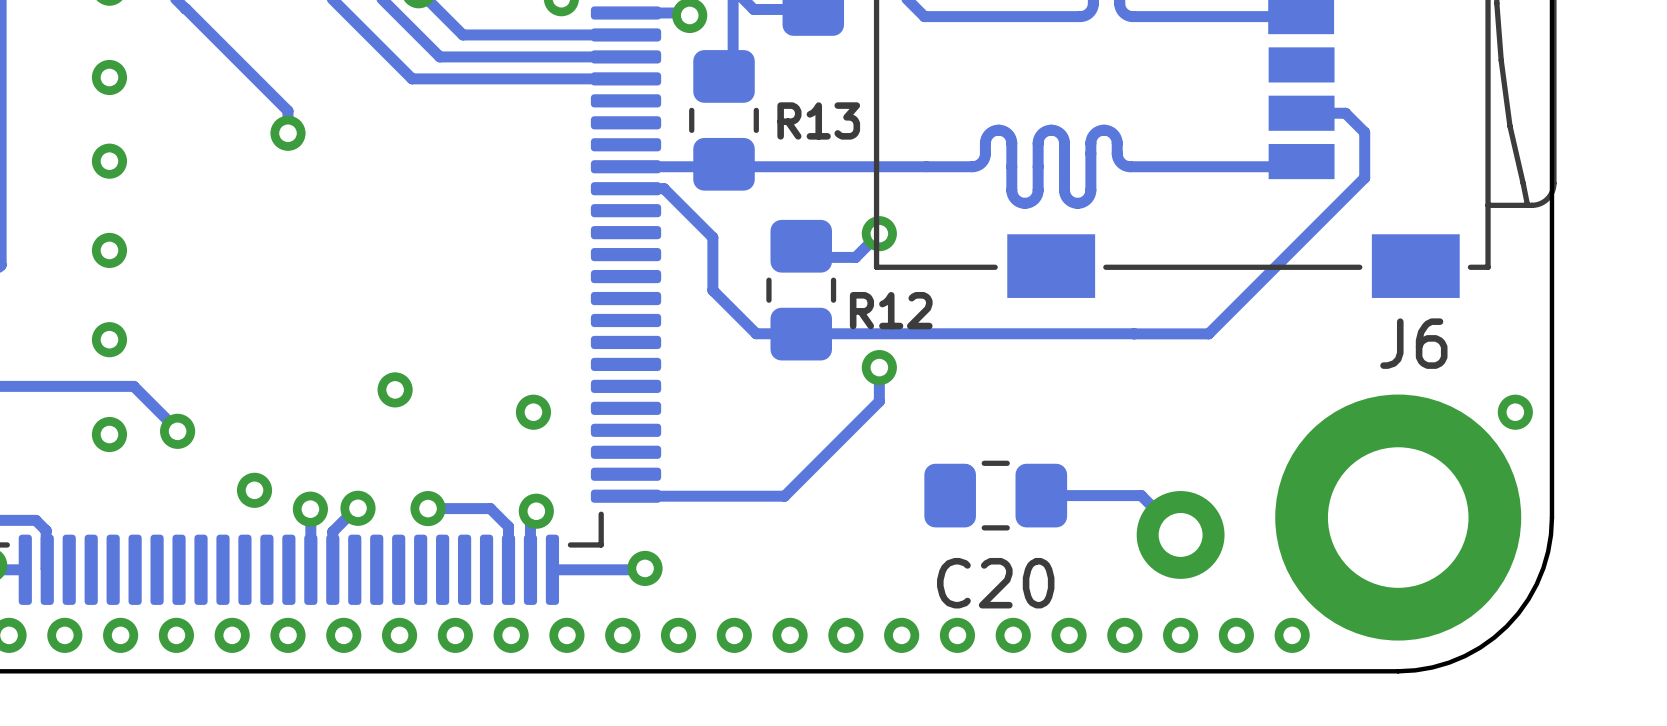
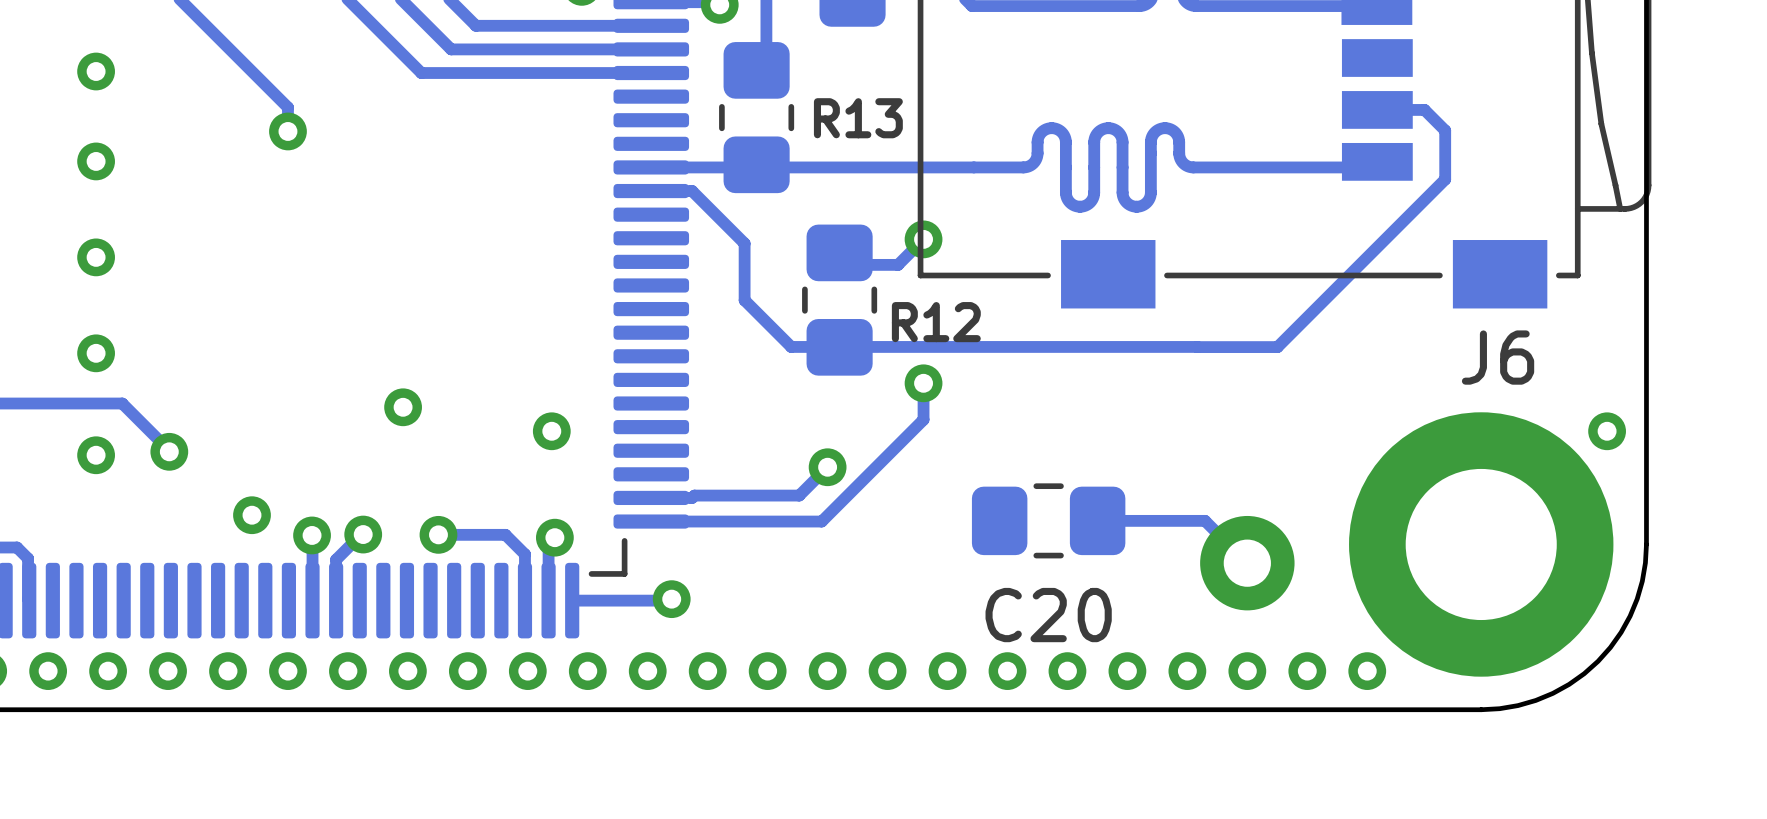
track: none -> (827, 467) (799, 495) (694, 495) (692, 497) (651, 497)
via: none -> (827, 467)

